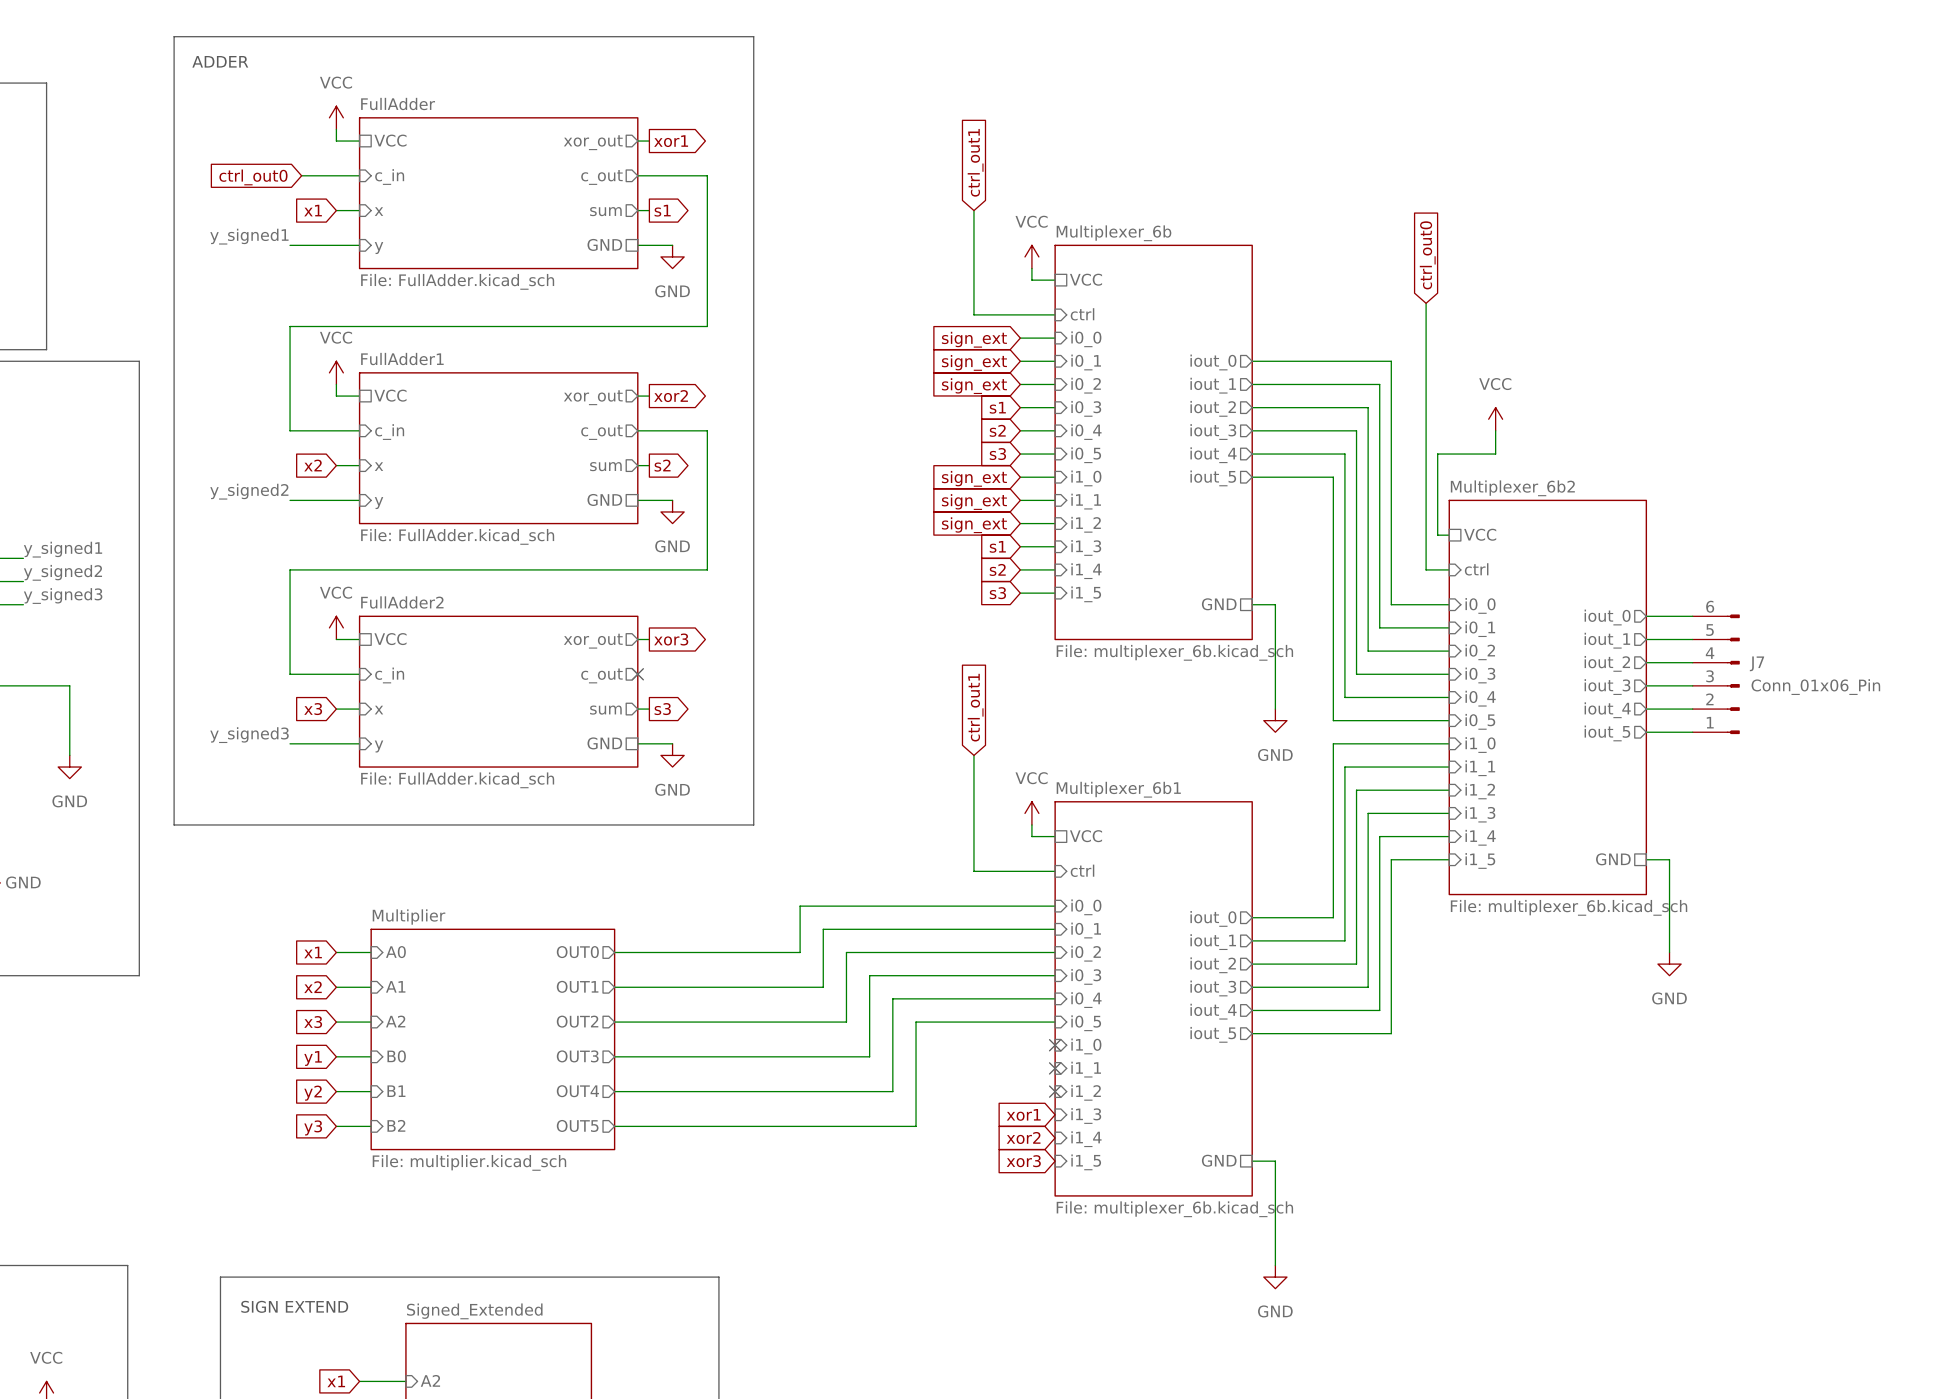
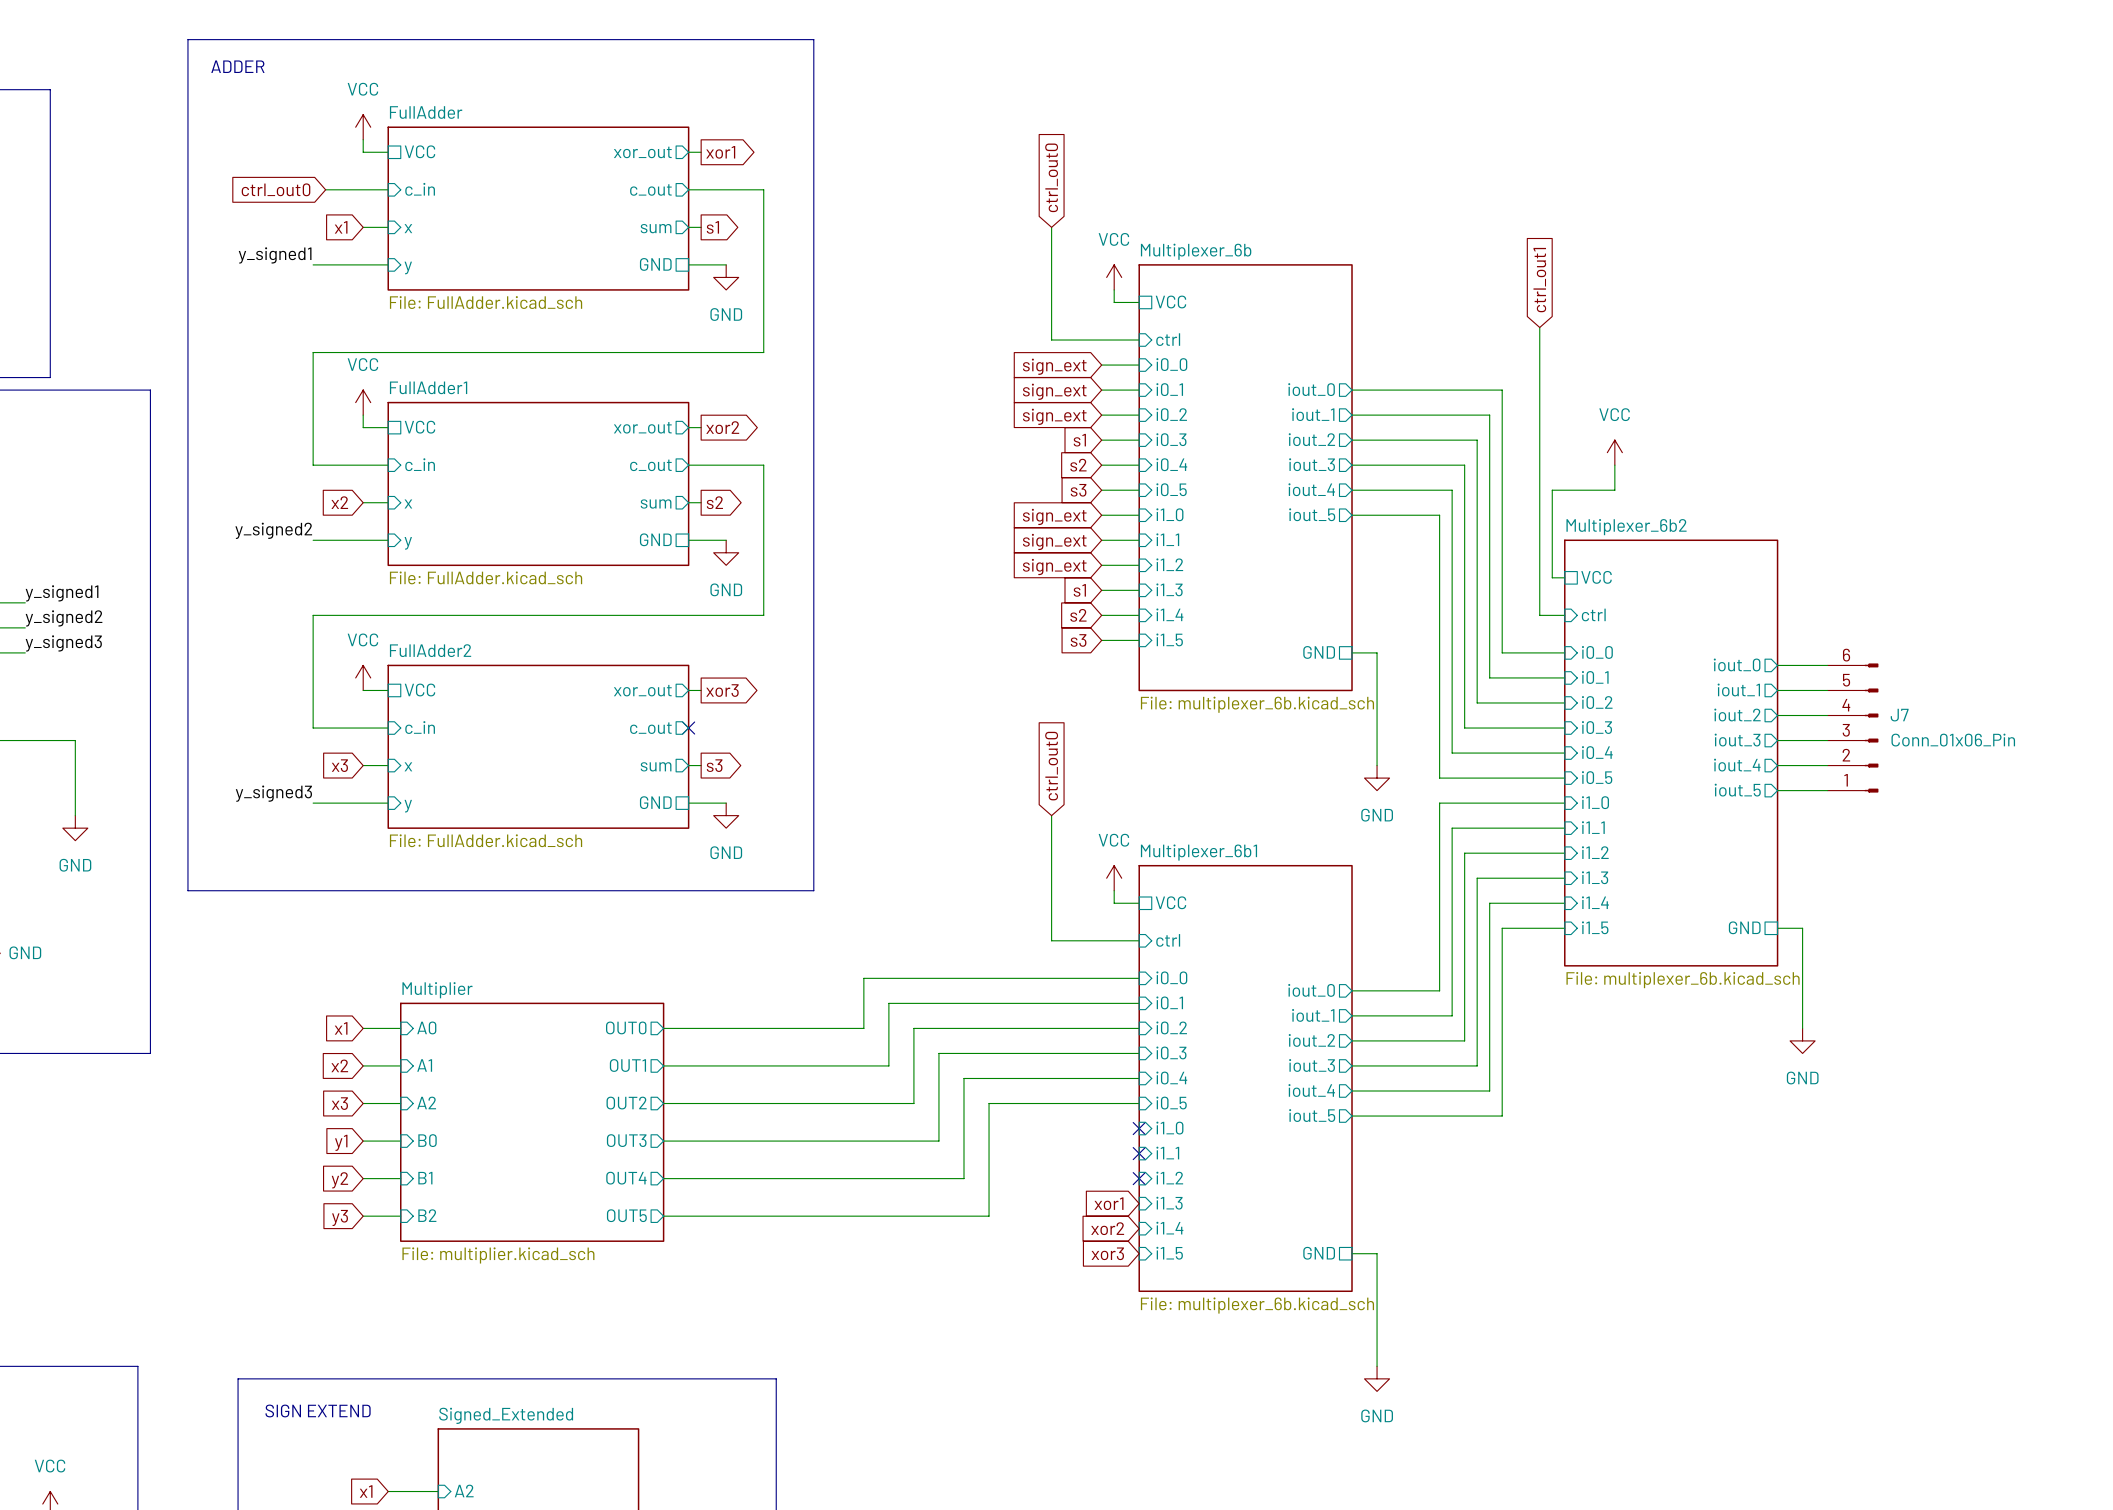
global label: ctrl_out1 (975, 162) -> ctrl_out0 (1051, 177)
global label: ctrl_out0 (1427, 255) -> ctrl_out1 (1539, 280)
global label: ctrl_out1 (975, 707) -> ctrl_out0 (1051, 766)

